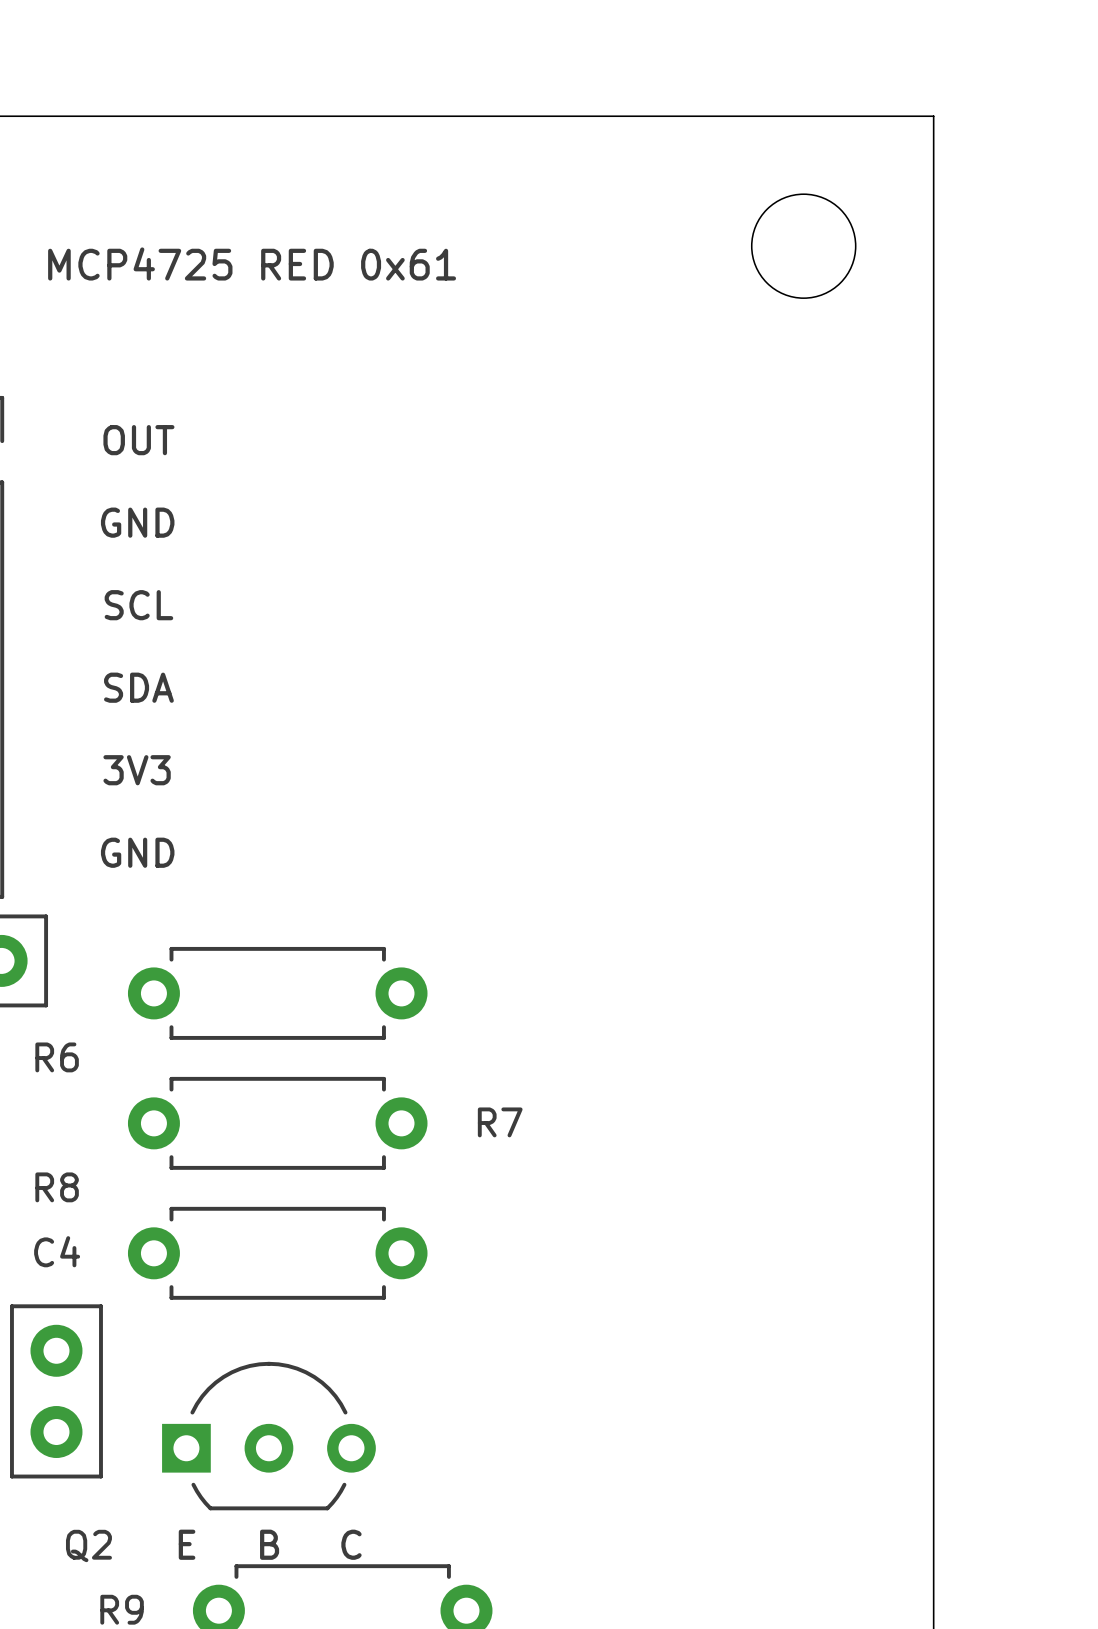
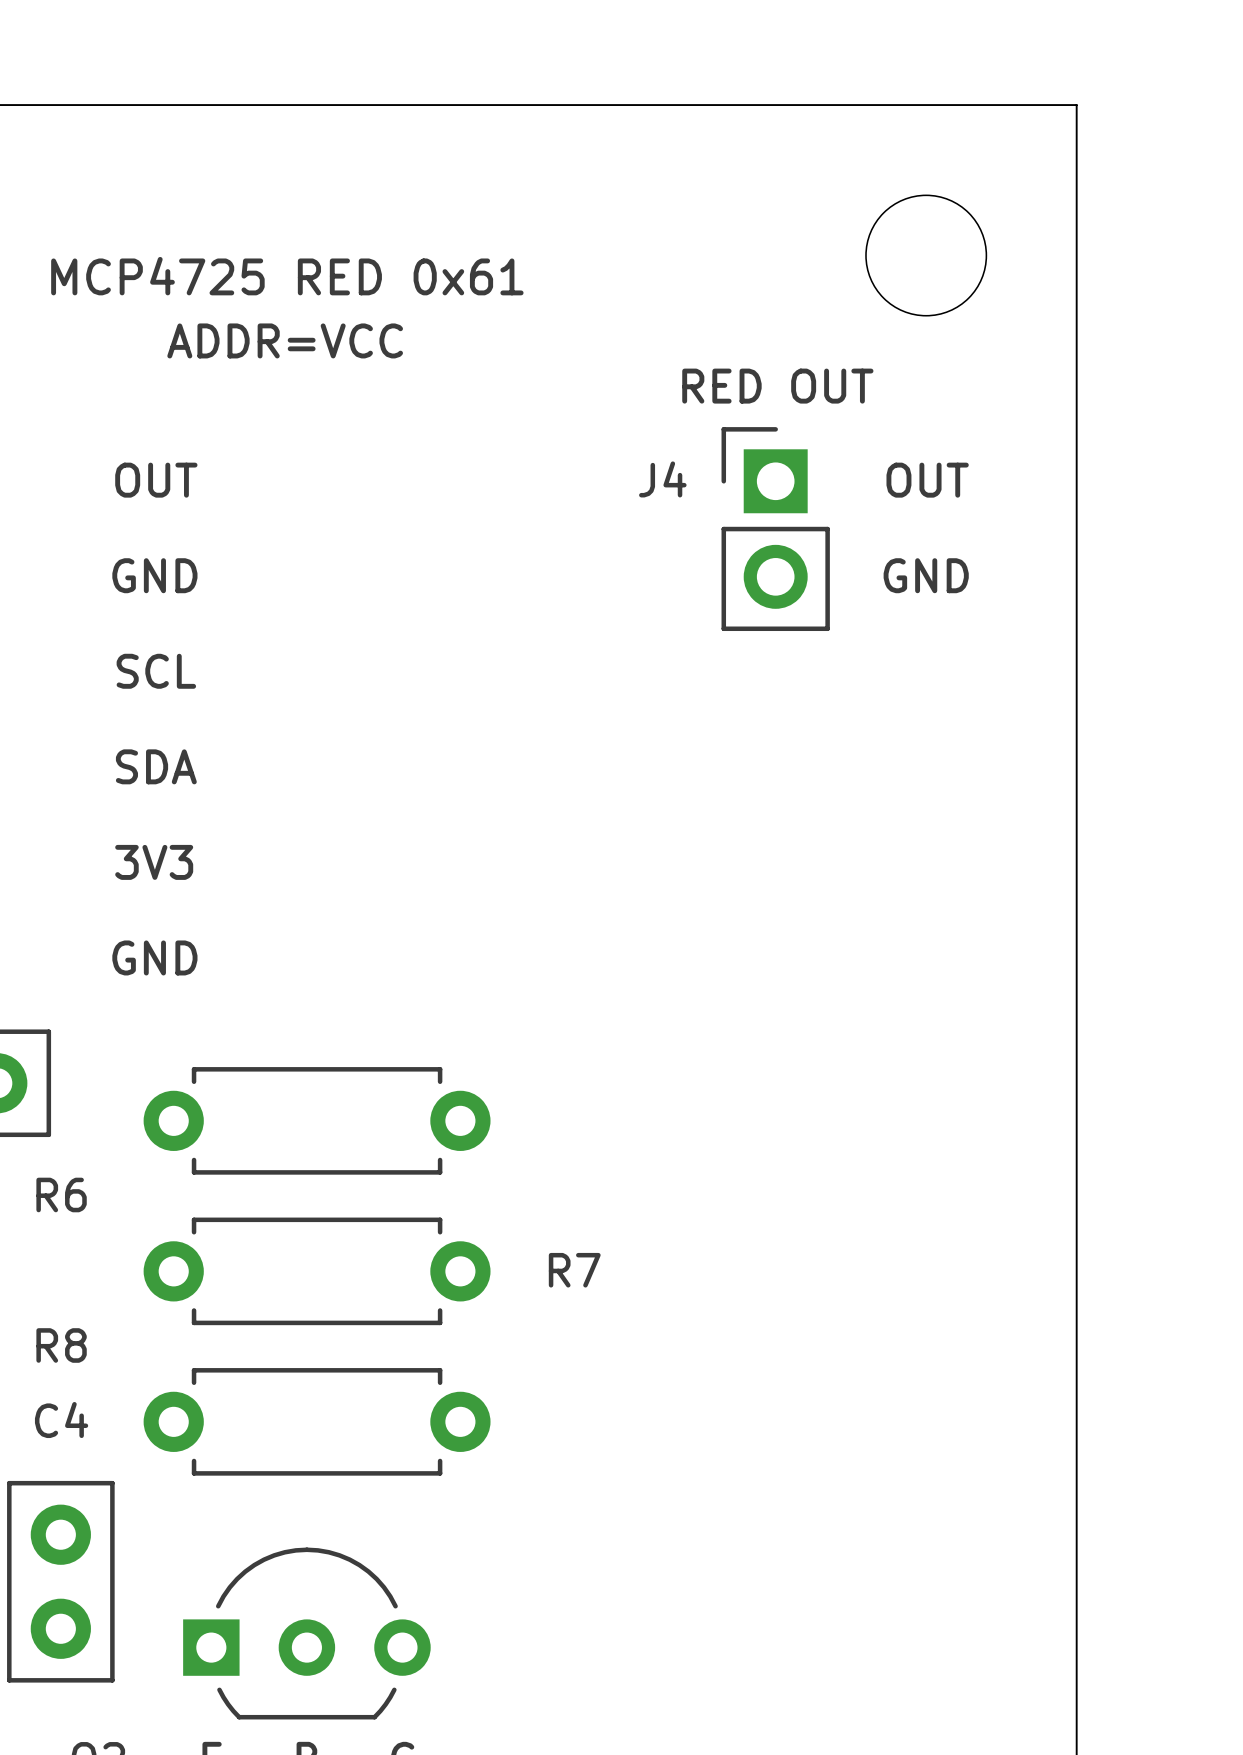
text: none -> ADDR=VCC (285, 340)
text: none -> RED OUT (777, 386)
text: none -> OUT (927, 480)
J4: none -> (775, 529)
text: none -> GND (926, 575)

